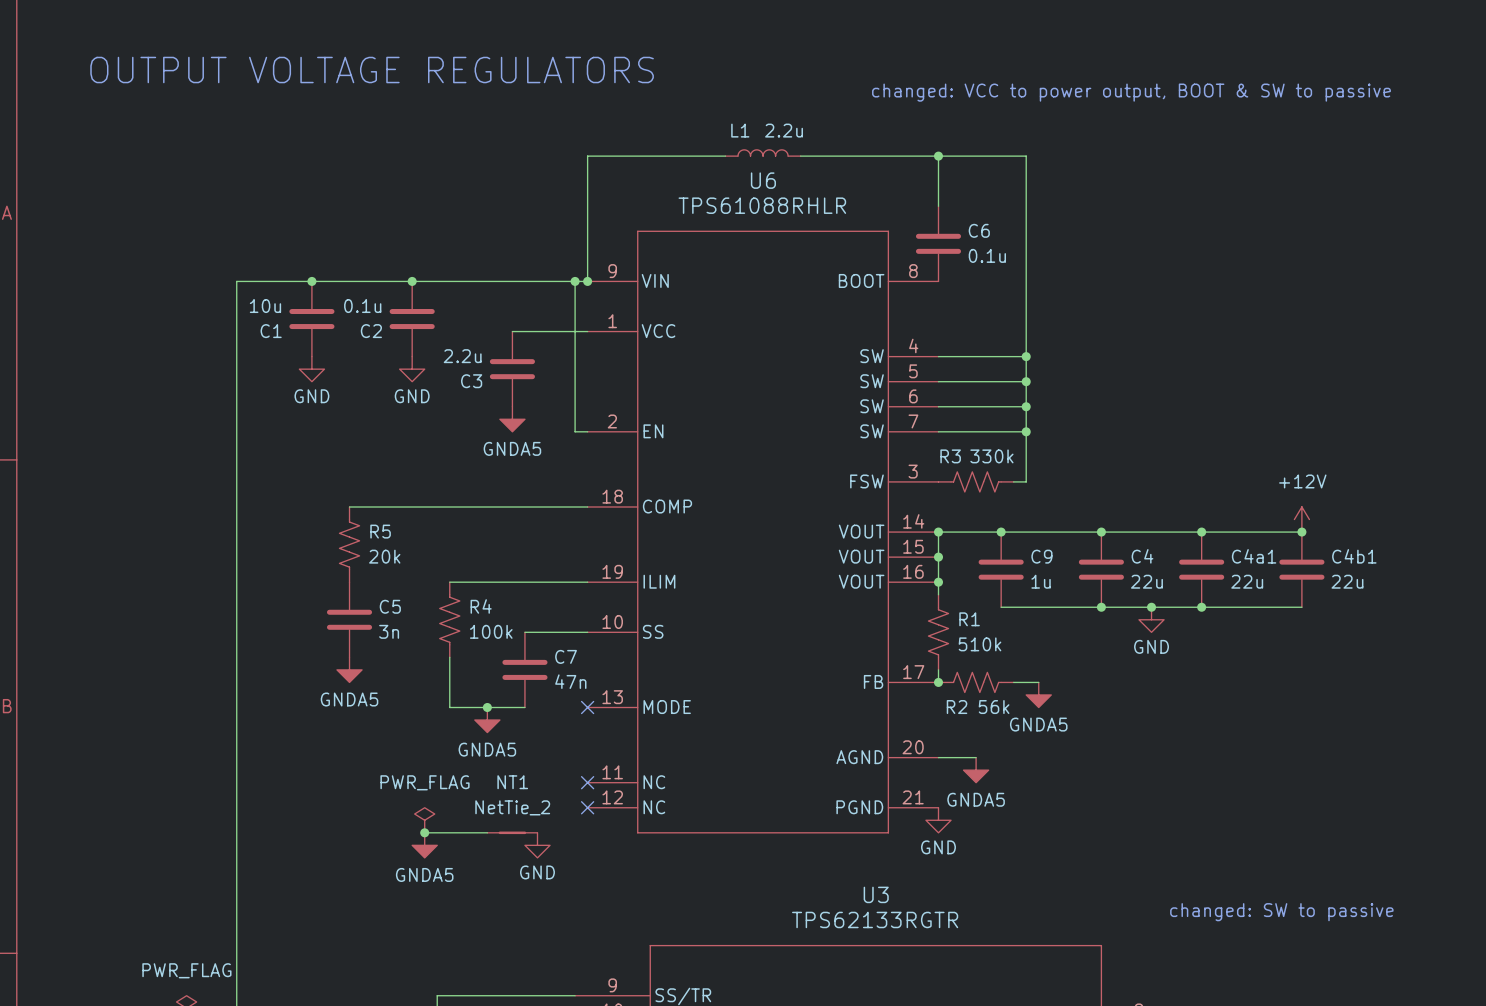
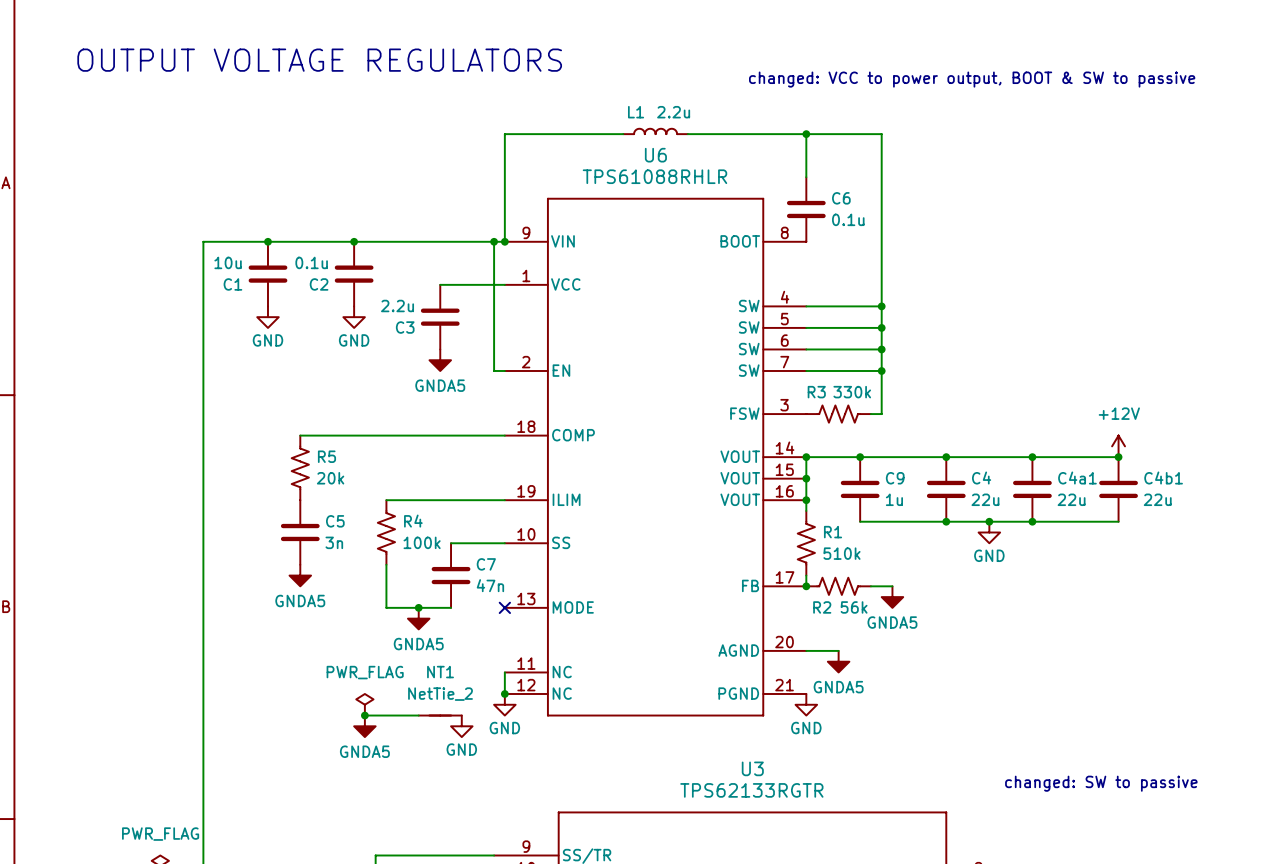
wire: none -> (504, 672) (504, 693)
no-connect mark: (587, 782) -> none
no-connect mark: (587, 807) -> none
junction: none -> (504, 693)
power symbol: none -> GND (504, 704)

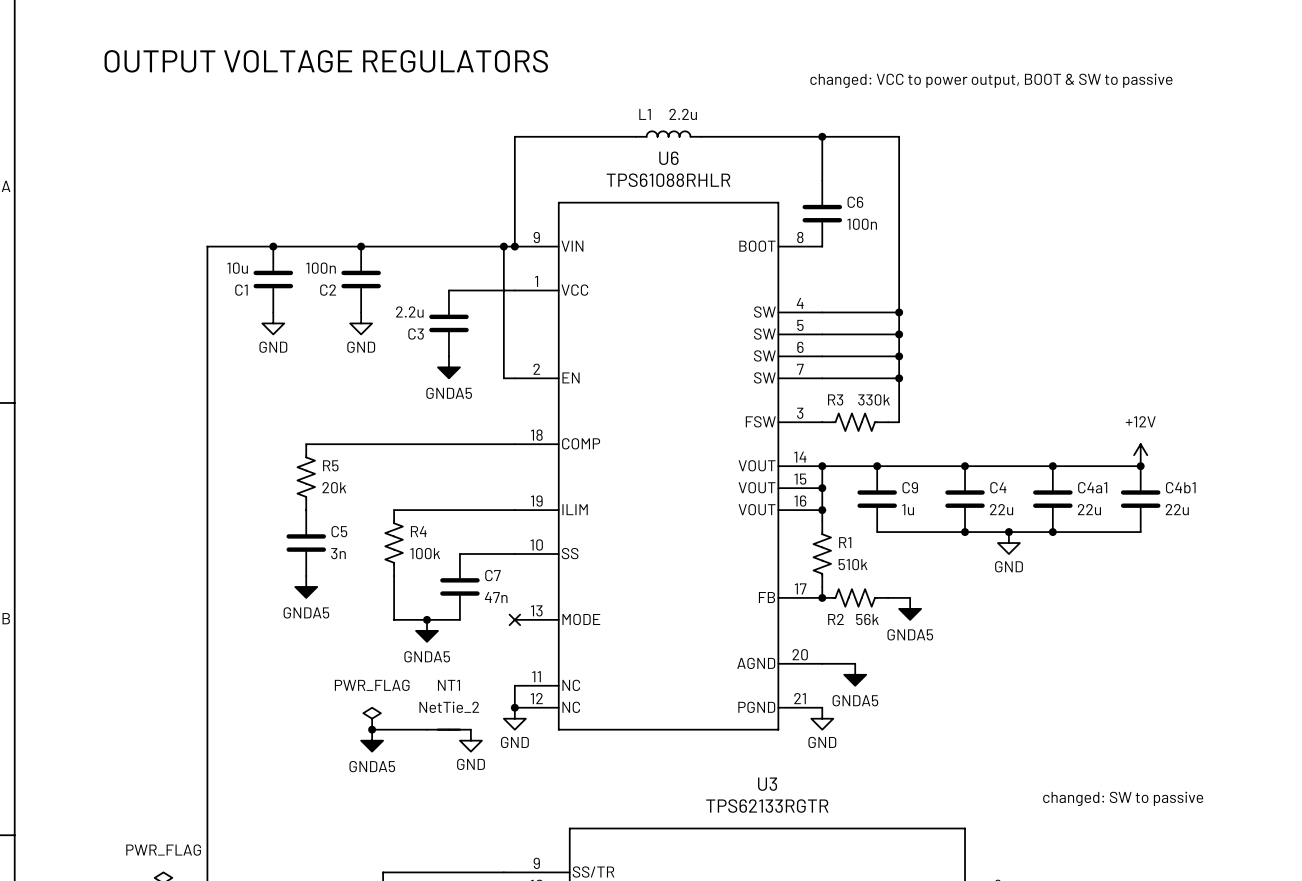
C6 value: 0.1u (848, 219) -> 100n (862, 224)
C2 value: 0.1u (311, 262) -> 100n (321, 268)

